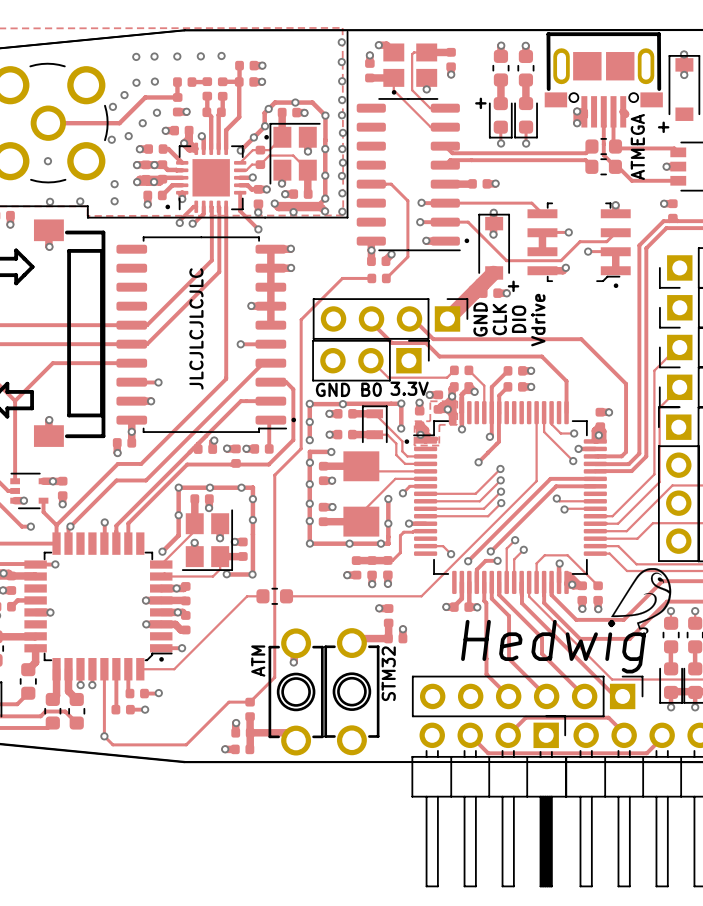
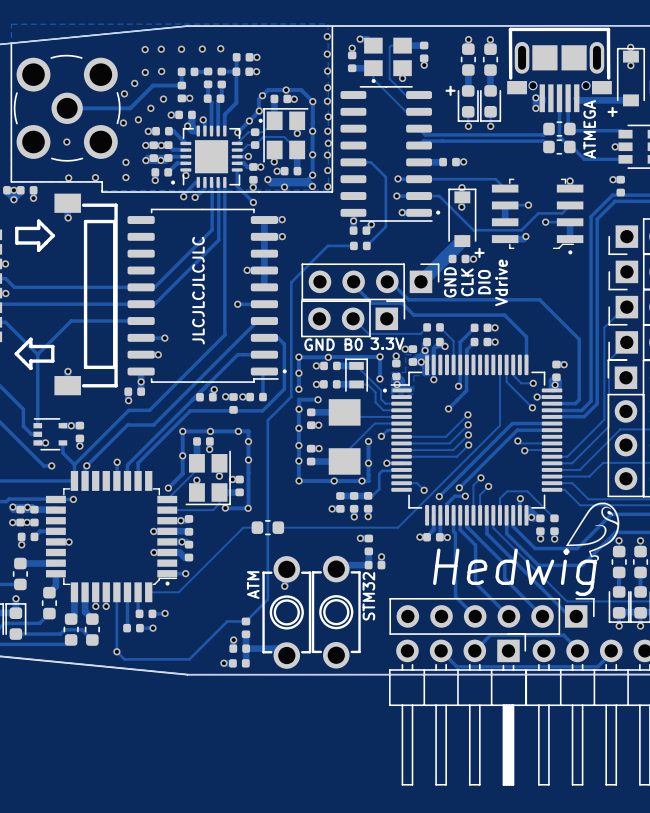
track: none -> (578, 100) (630, 100)

